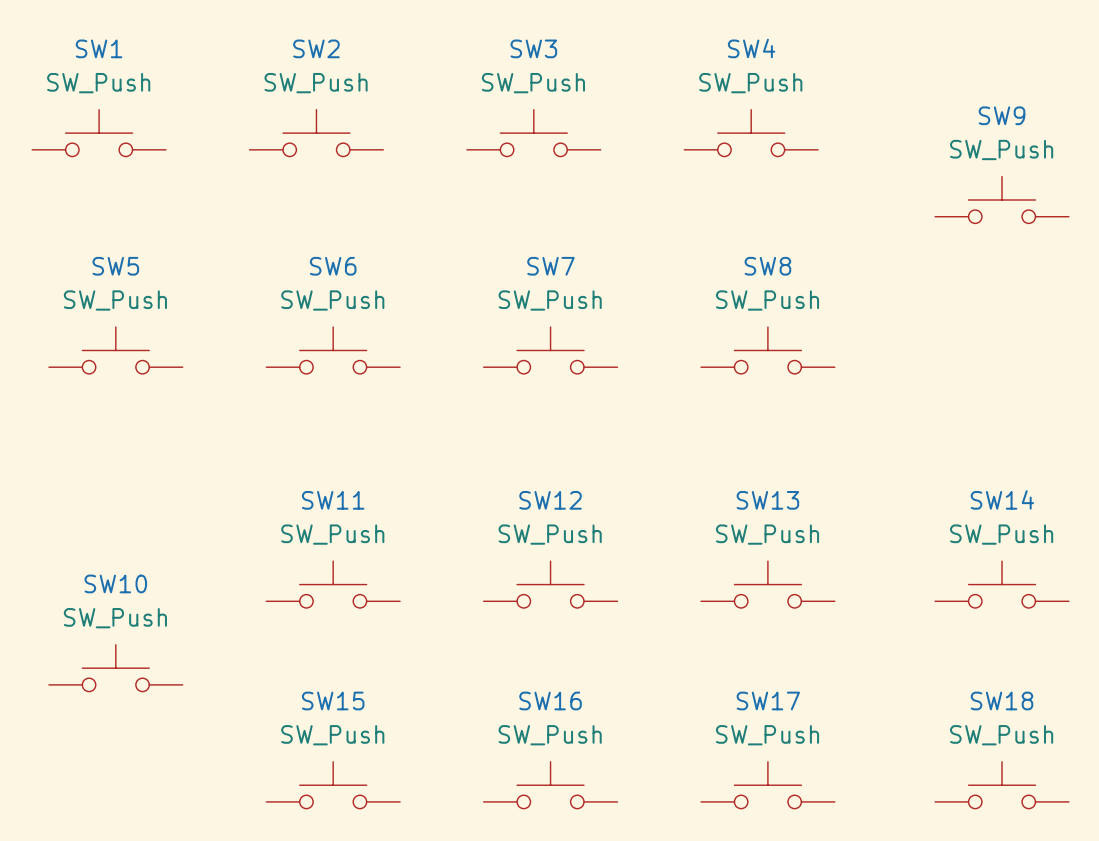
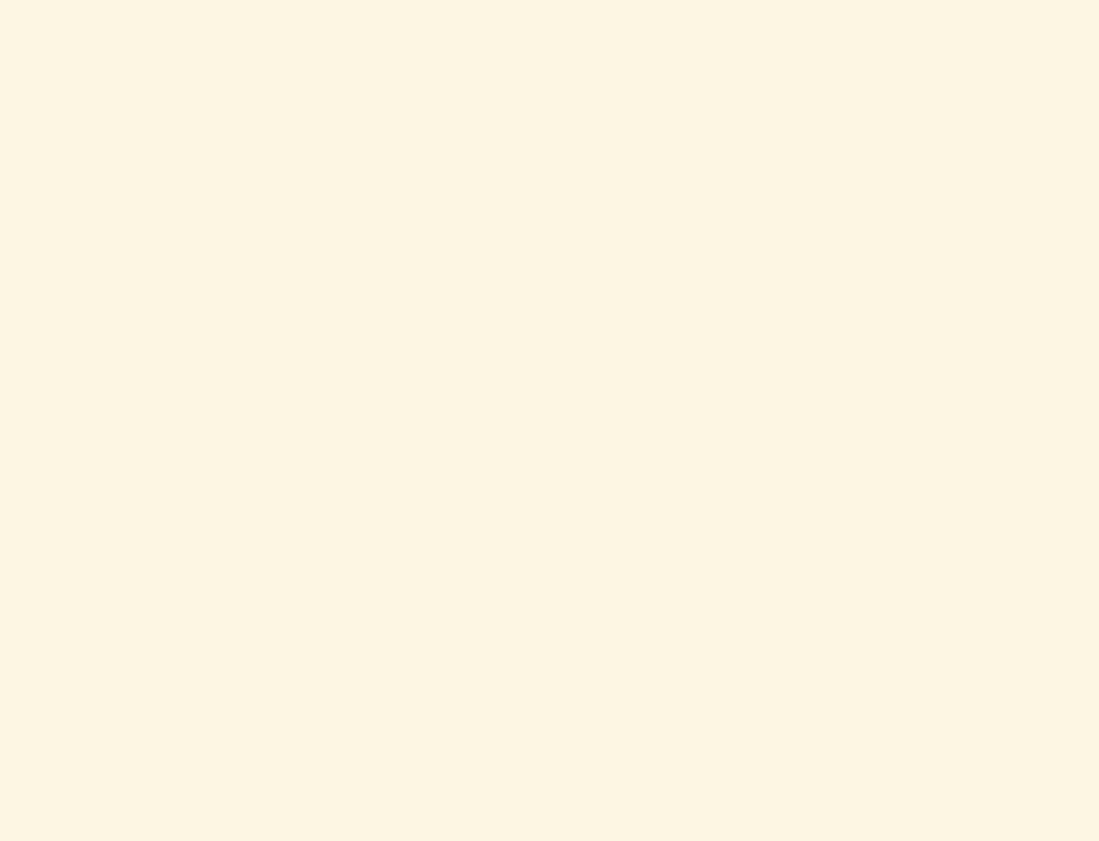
SW1: SW_Push (99, 133) -> none
SW2: SW_Push (316, 133) -> none
SW3: SW_Push (533, 133) -> none
SW4: SW_Push (751, 133) -> none
SW9: SW_Push (1002, 199) -> none
SW5: SW_Push (115, 350) -> none
SW6: SW_Push (333, 350) -> none
SW7: SW_Push (550, 350) -> none
SW8: SW_Push (767, 350) -> none
SW11: SW_Push (333, 584) -> none
SW12: SW_Push (550, 584) -> none
SW13: SW_Push (767, 584) -> none
SW14: SW_Push (1002, 584) -> none
SW10: SW_Push (115, 668) -> none
SW15: SW_Push (333, 785) -> none
SW16: SW_Push (550, 785) -> none
SW17: SW_Push (767, 785) -> none
SW18: SW_Push (1002, 785) -> none

